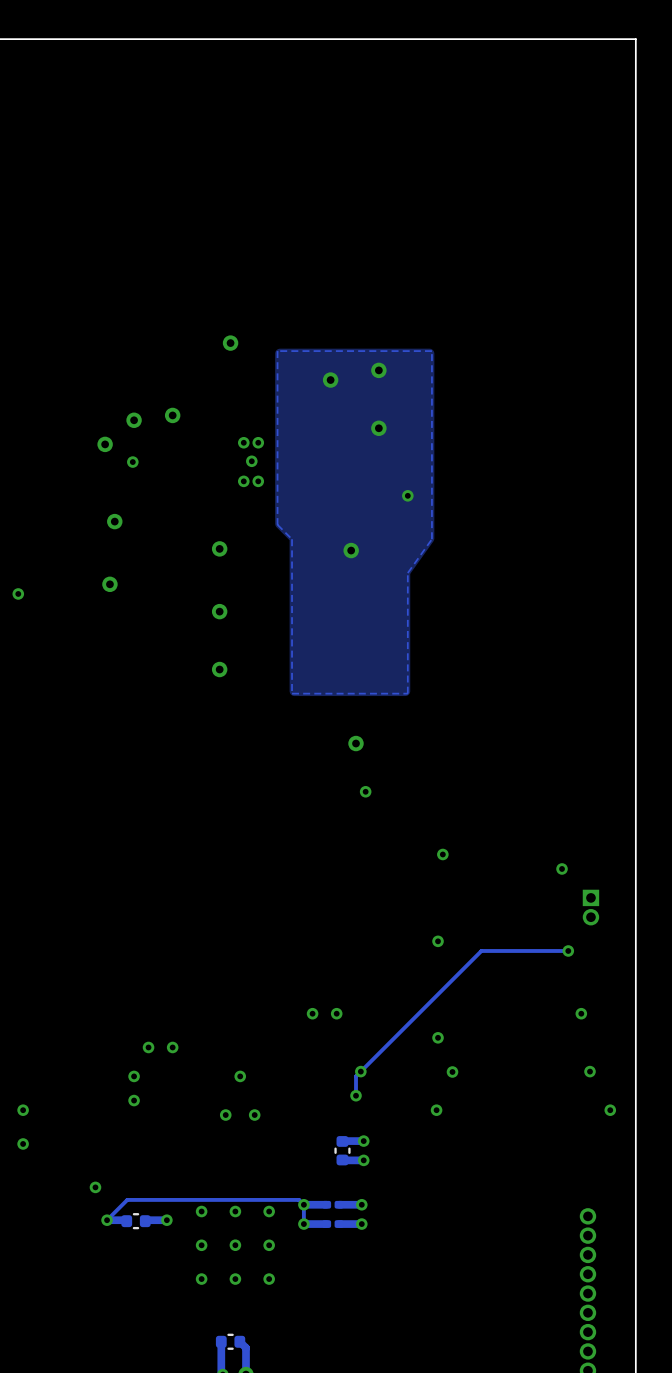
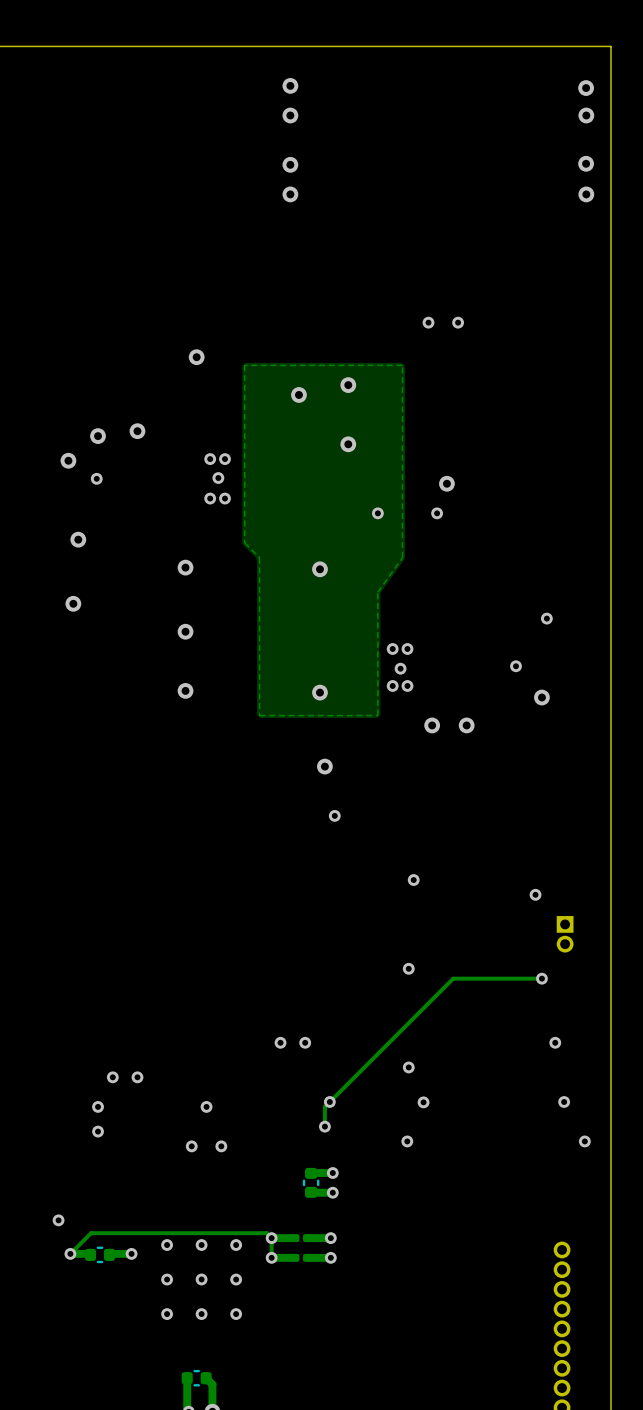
via: none -> (290, 85)
via: none -> (586, 88)
via: none -> (290, 115)
via: none -> (586, 115)
via: none -> (586, 163)
via: none -> (290, 164)
via: none -> (290, 194)
via: none -> (586, 194)
via: none -> (428, 322)
via: none -> (458, 322)
via: none -> (446, 483)
via: none -> (437, 513)
via: none -> (546, 618)
via: none -> (392, 648)
via: none -> (407, 648)
via: none -> (515, 666)
via: none -> (400, 668)
via: none -> (392, 685)
via: none -> (407, 685)
via: none -> (319, 692)
via: none -> (541, 697)
via: none -> (432, 725)
via: none -> (466, 725)

